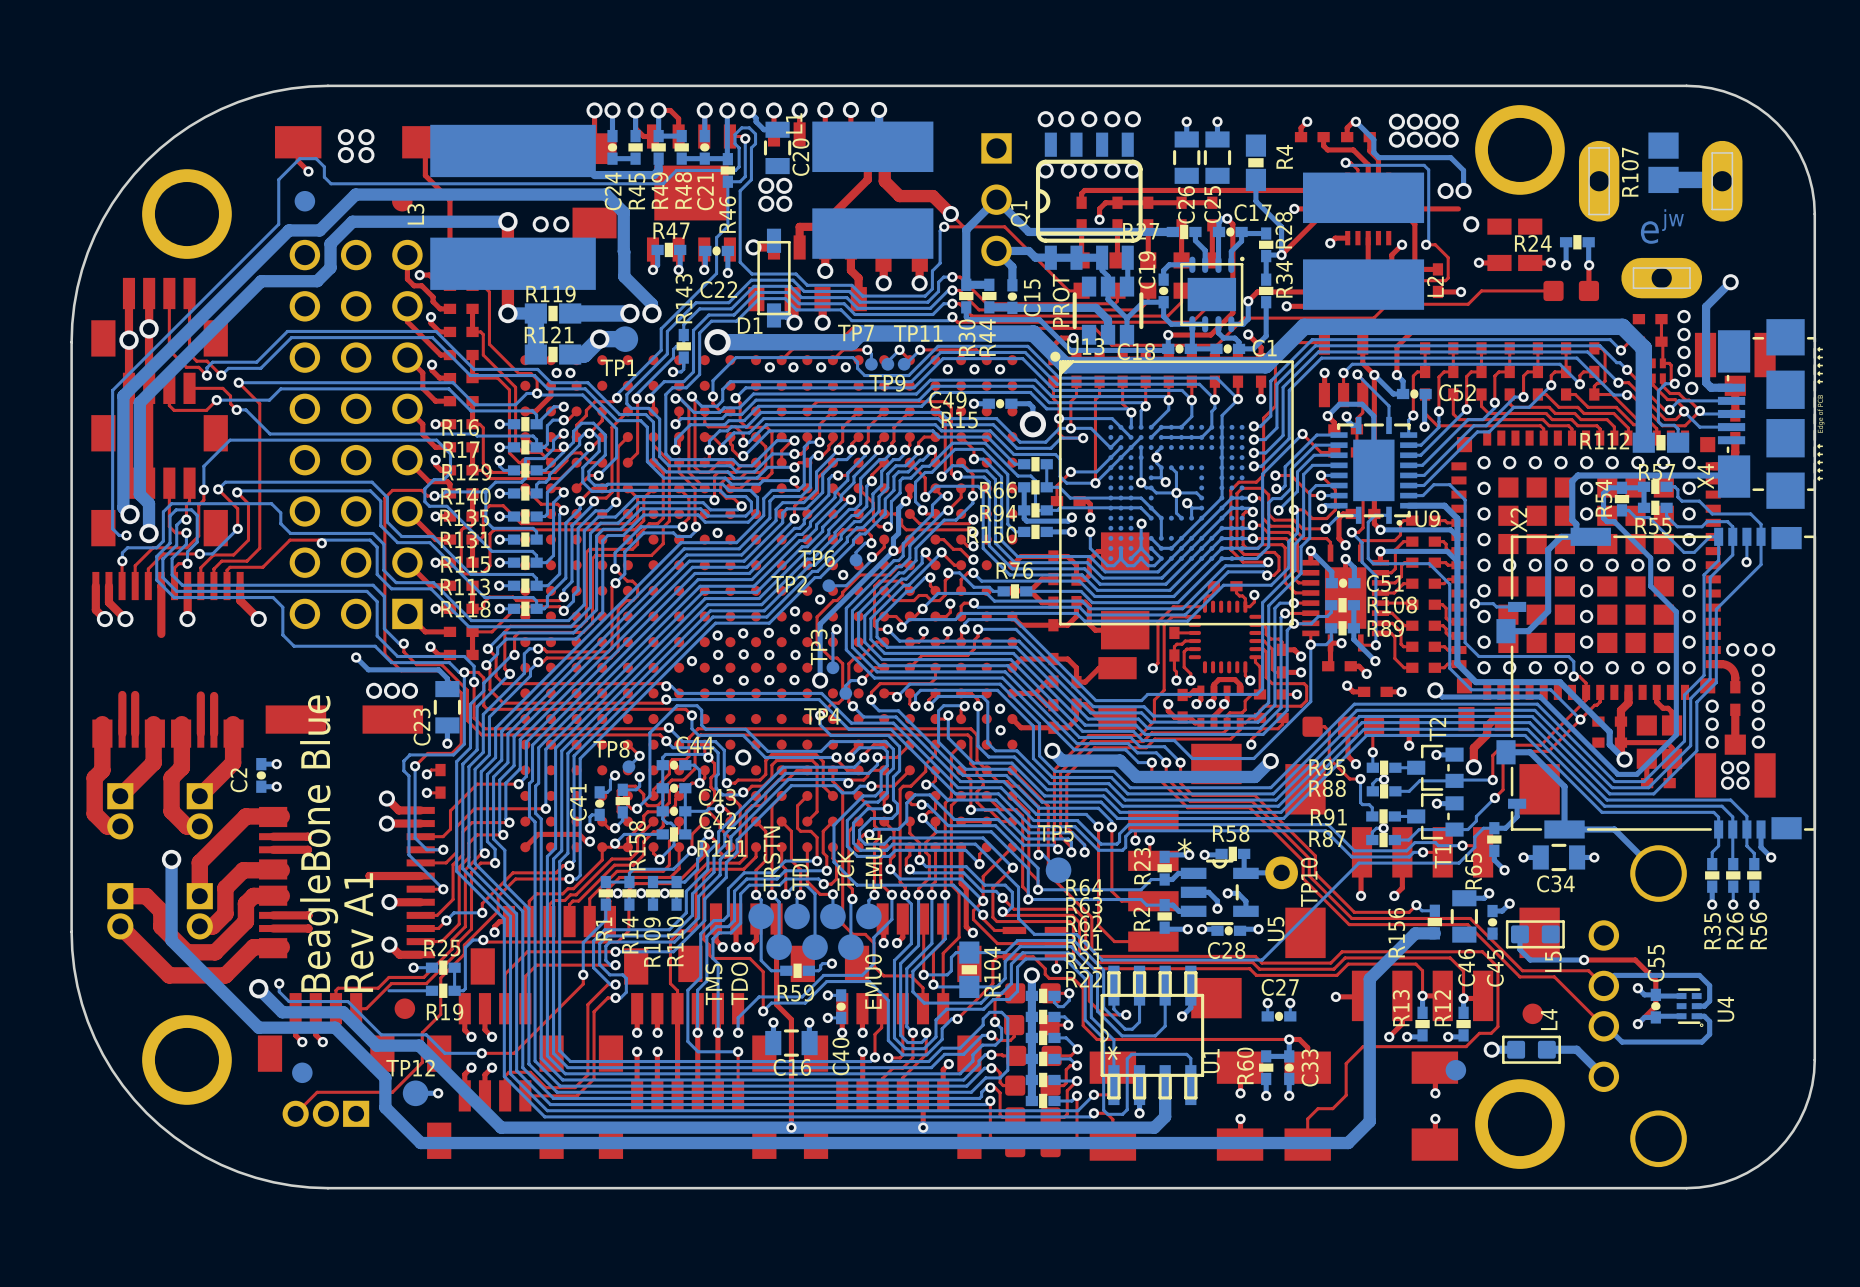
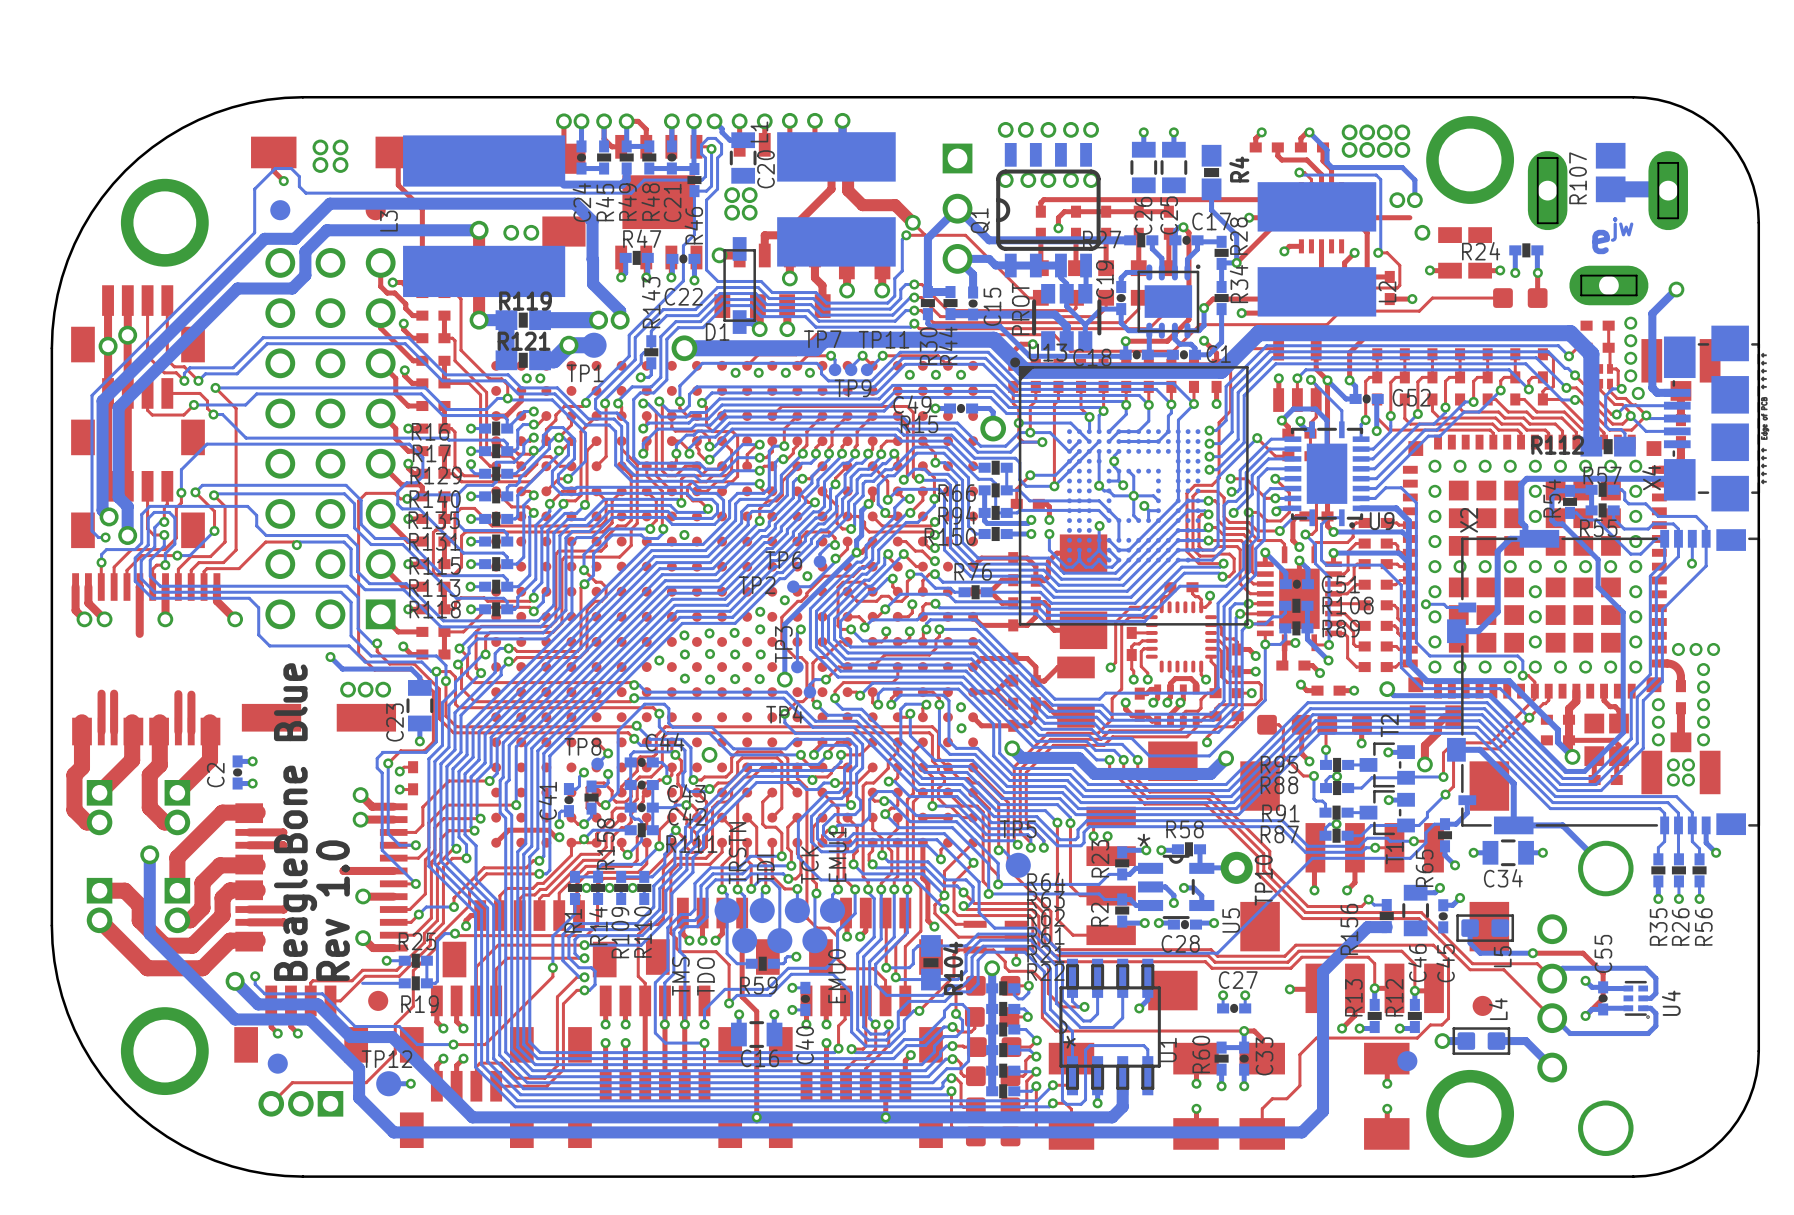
text: Rev A1 (359, 932) -> Rev 1.0 (333, 910)

